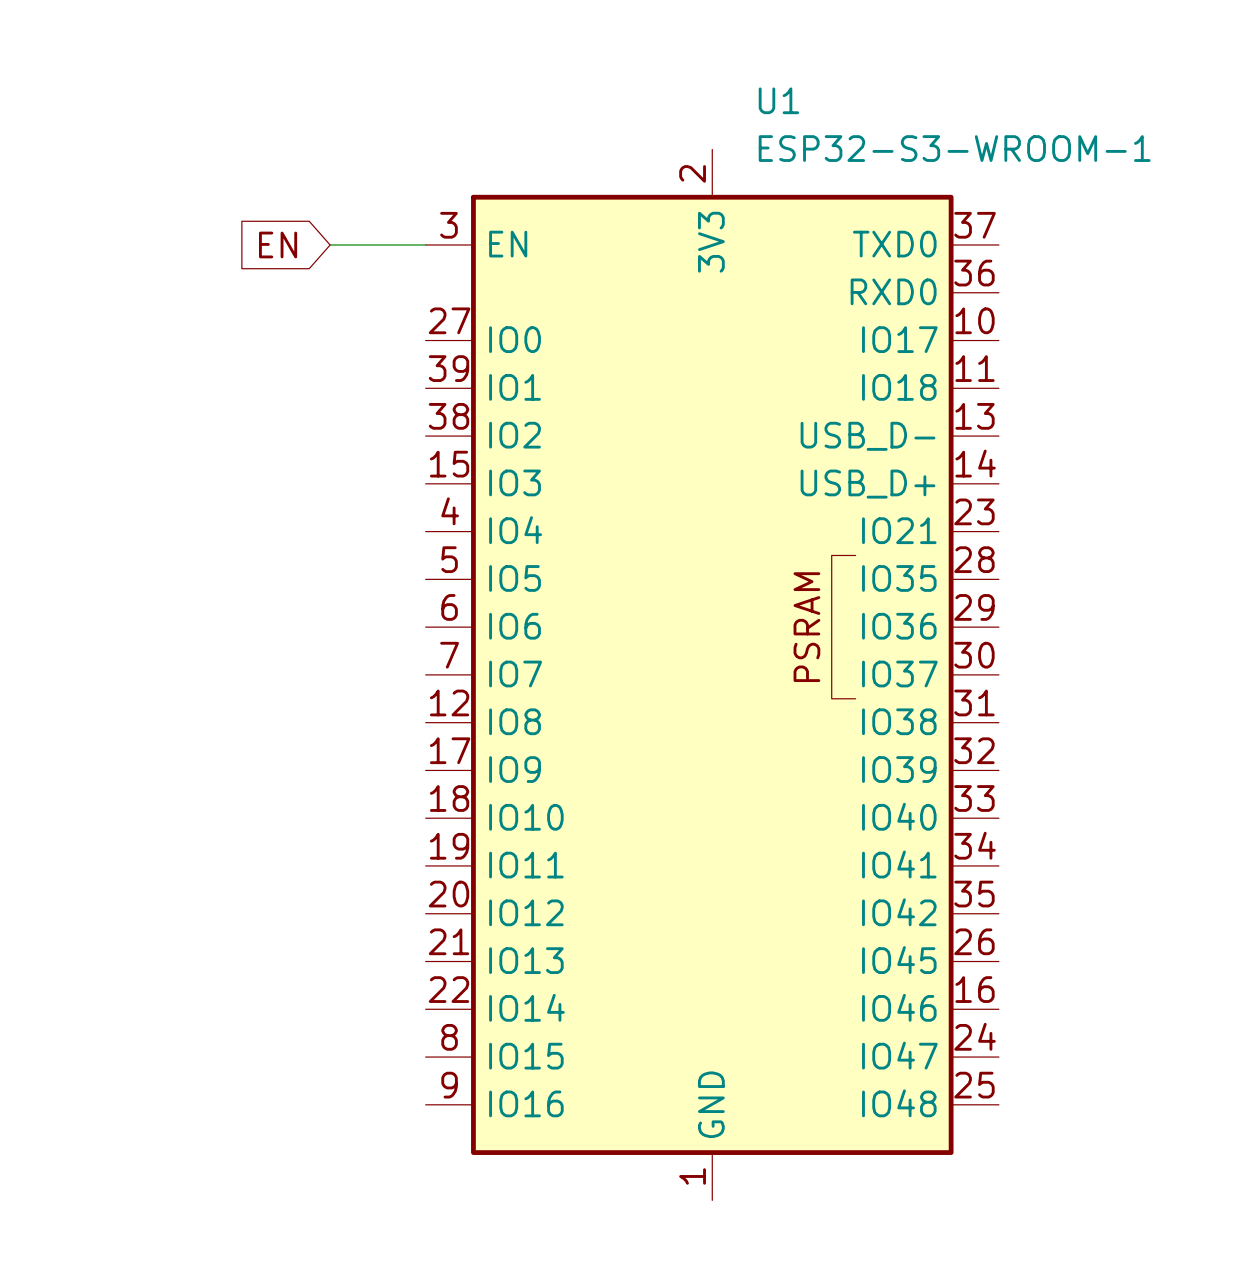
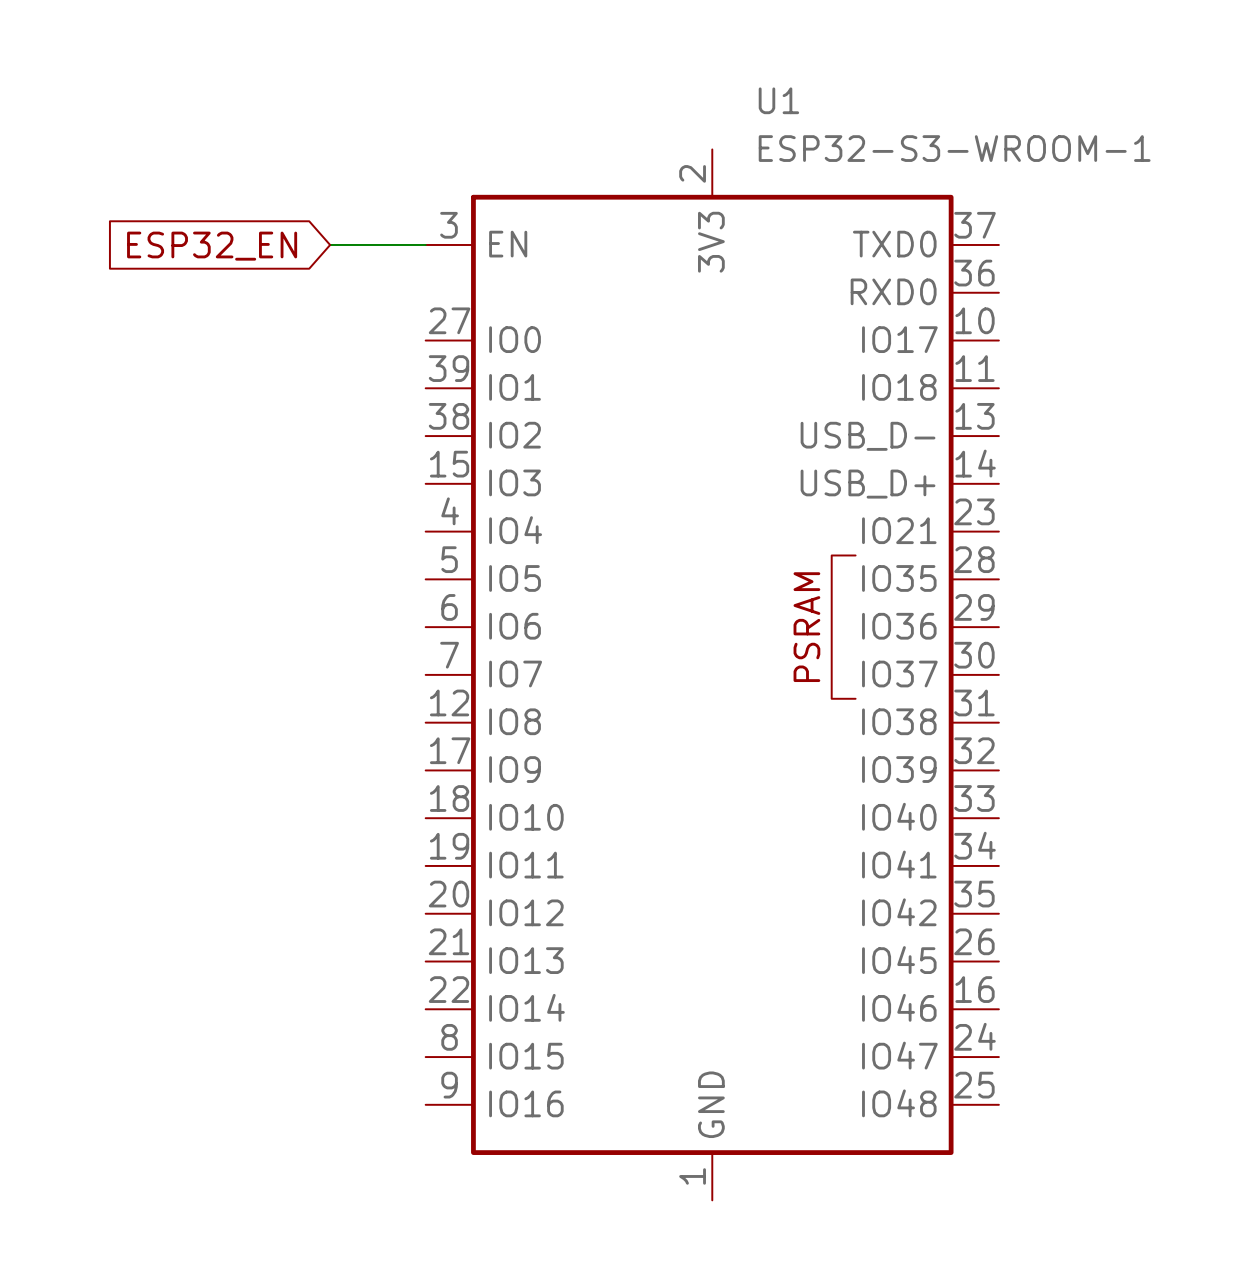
global label: EN (278, 244) -> ESP32_EN (212, 246)

